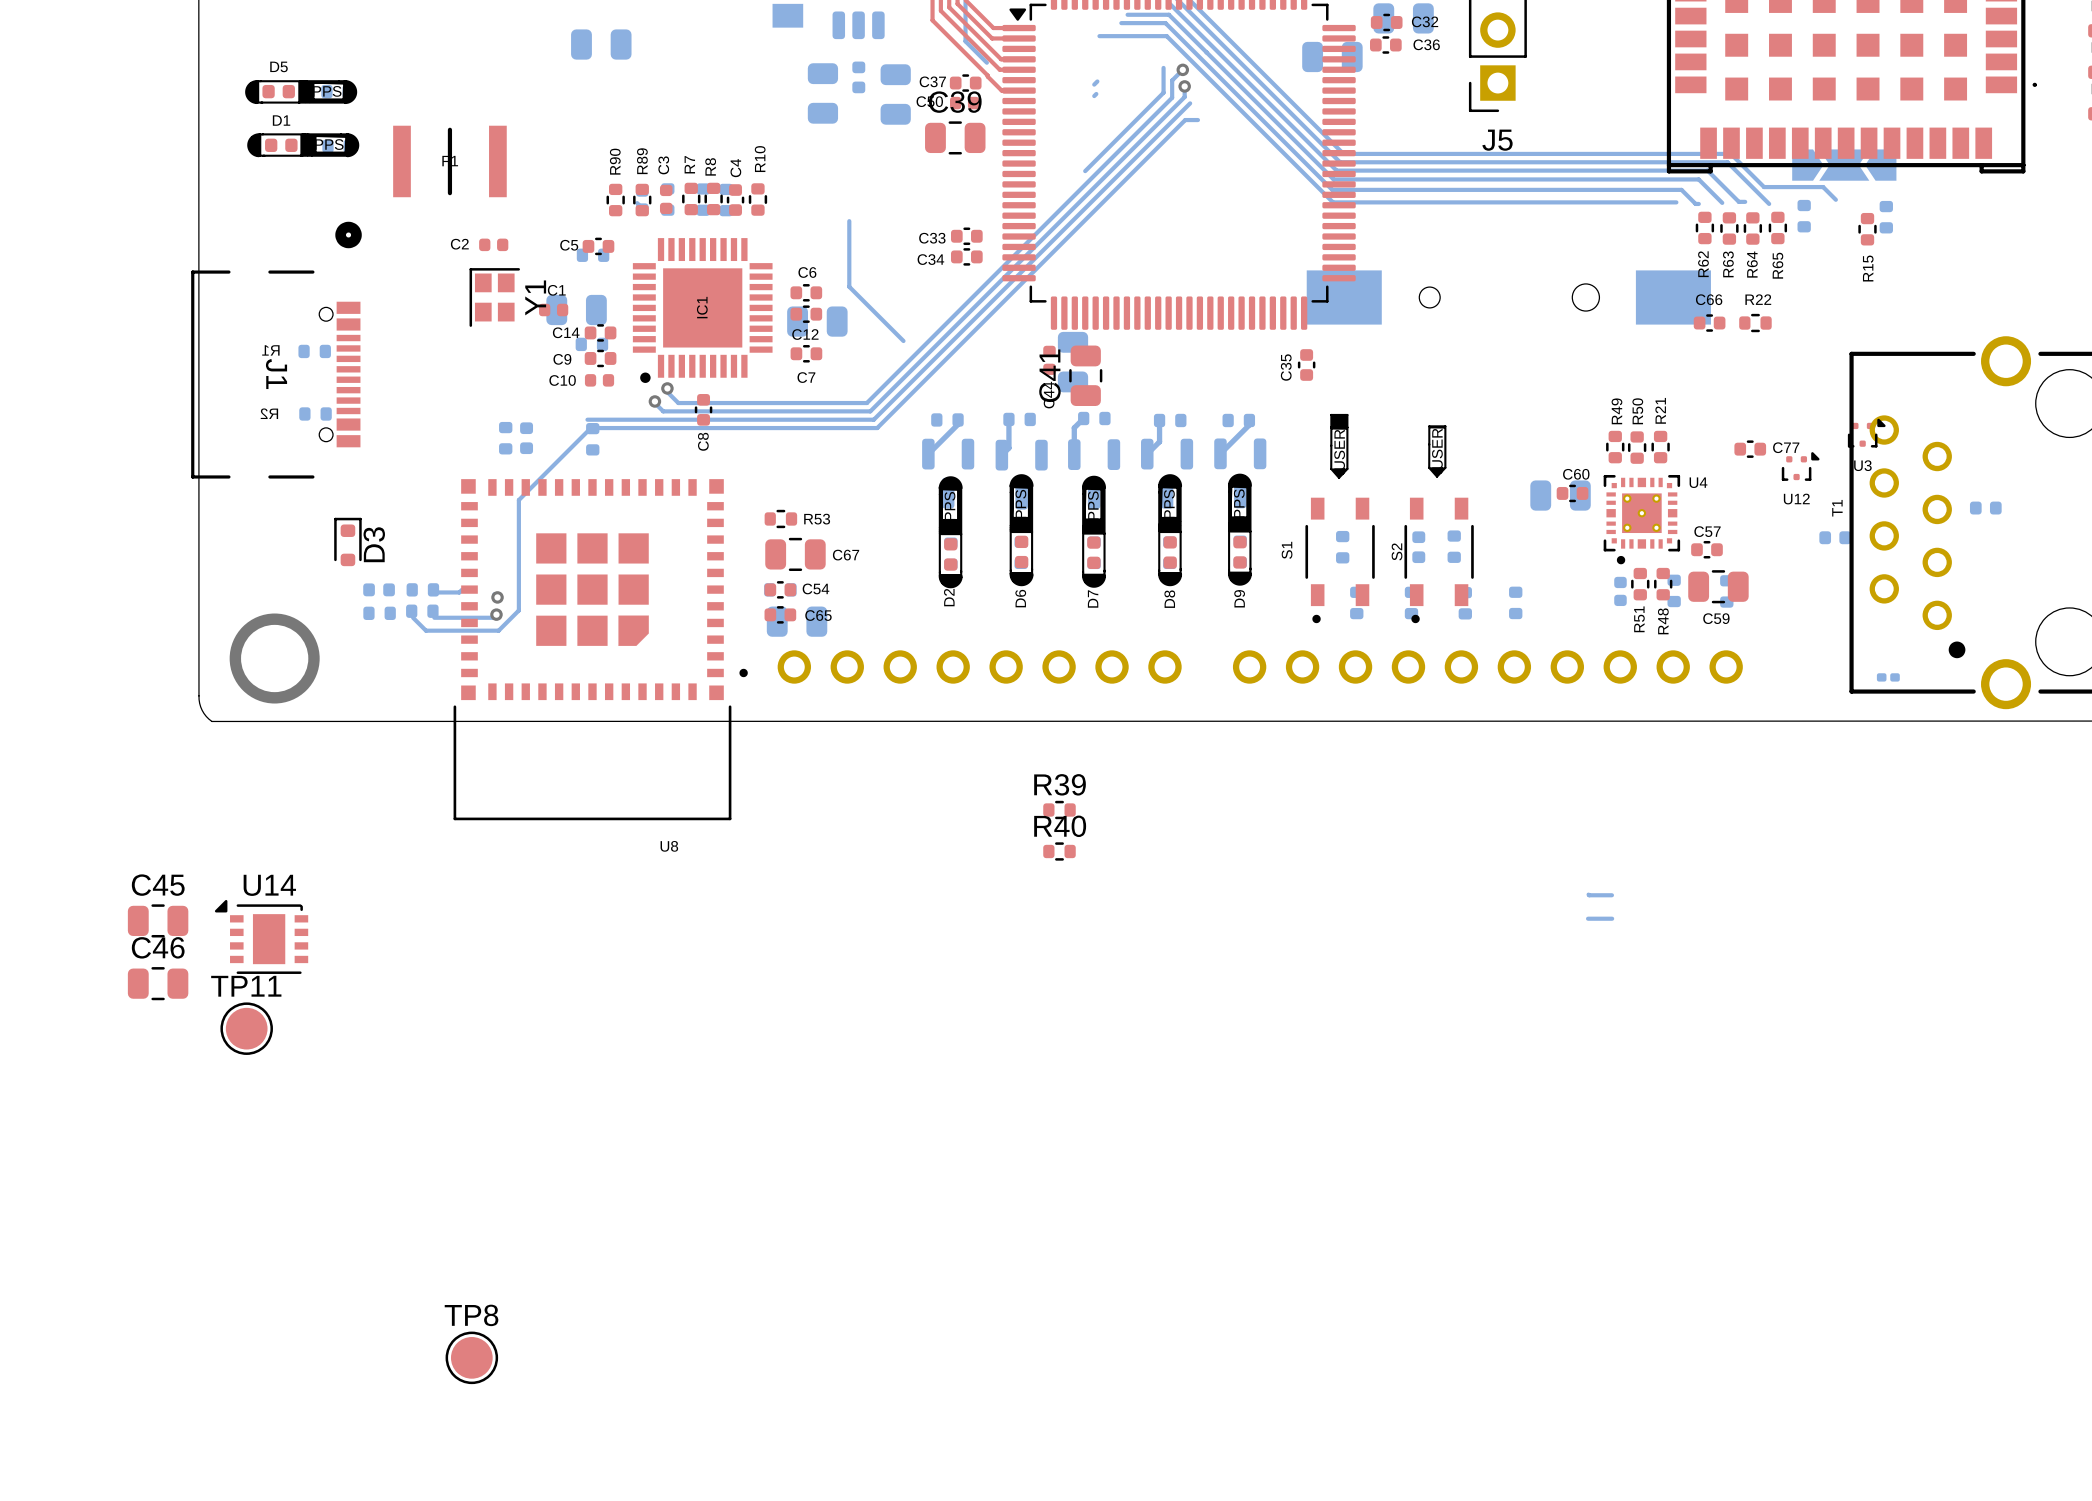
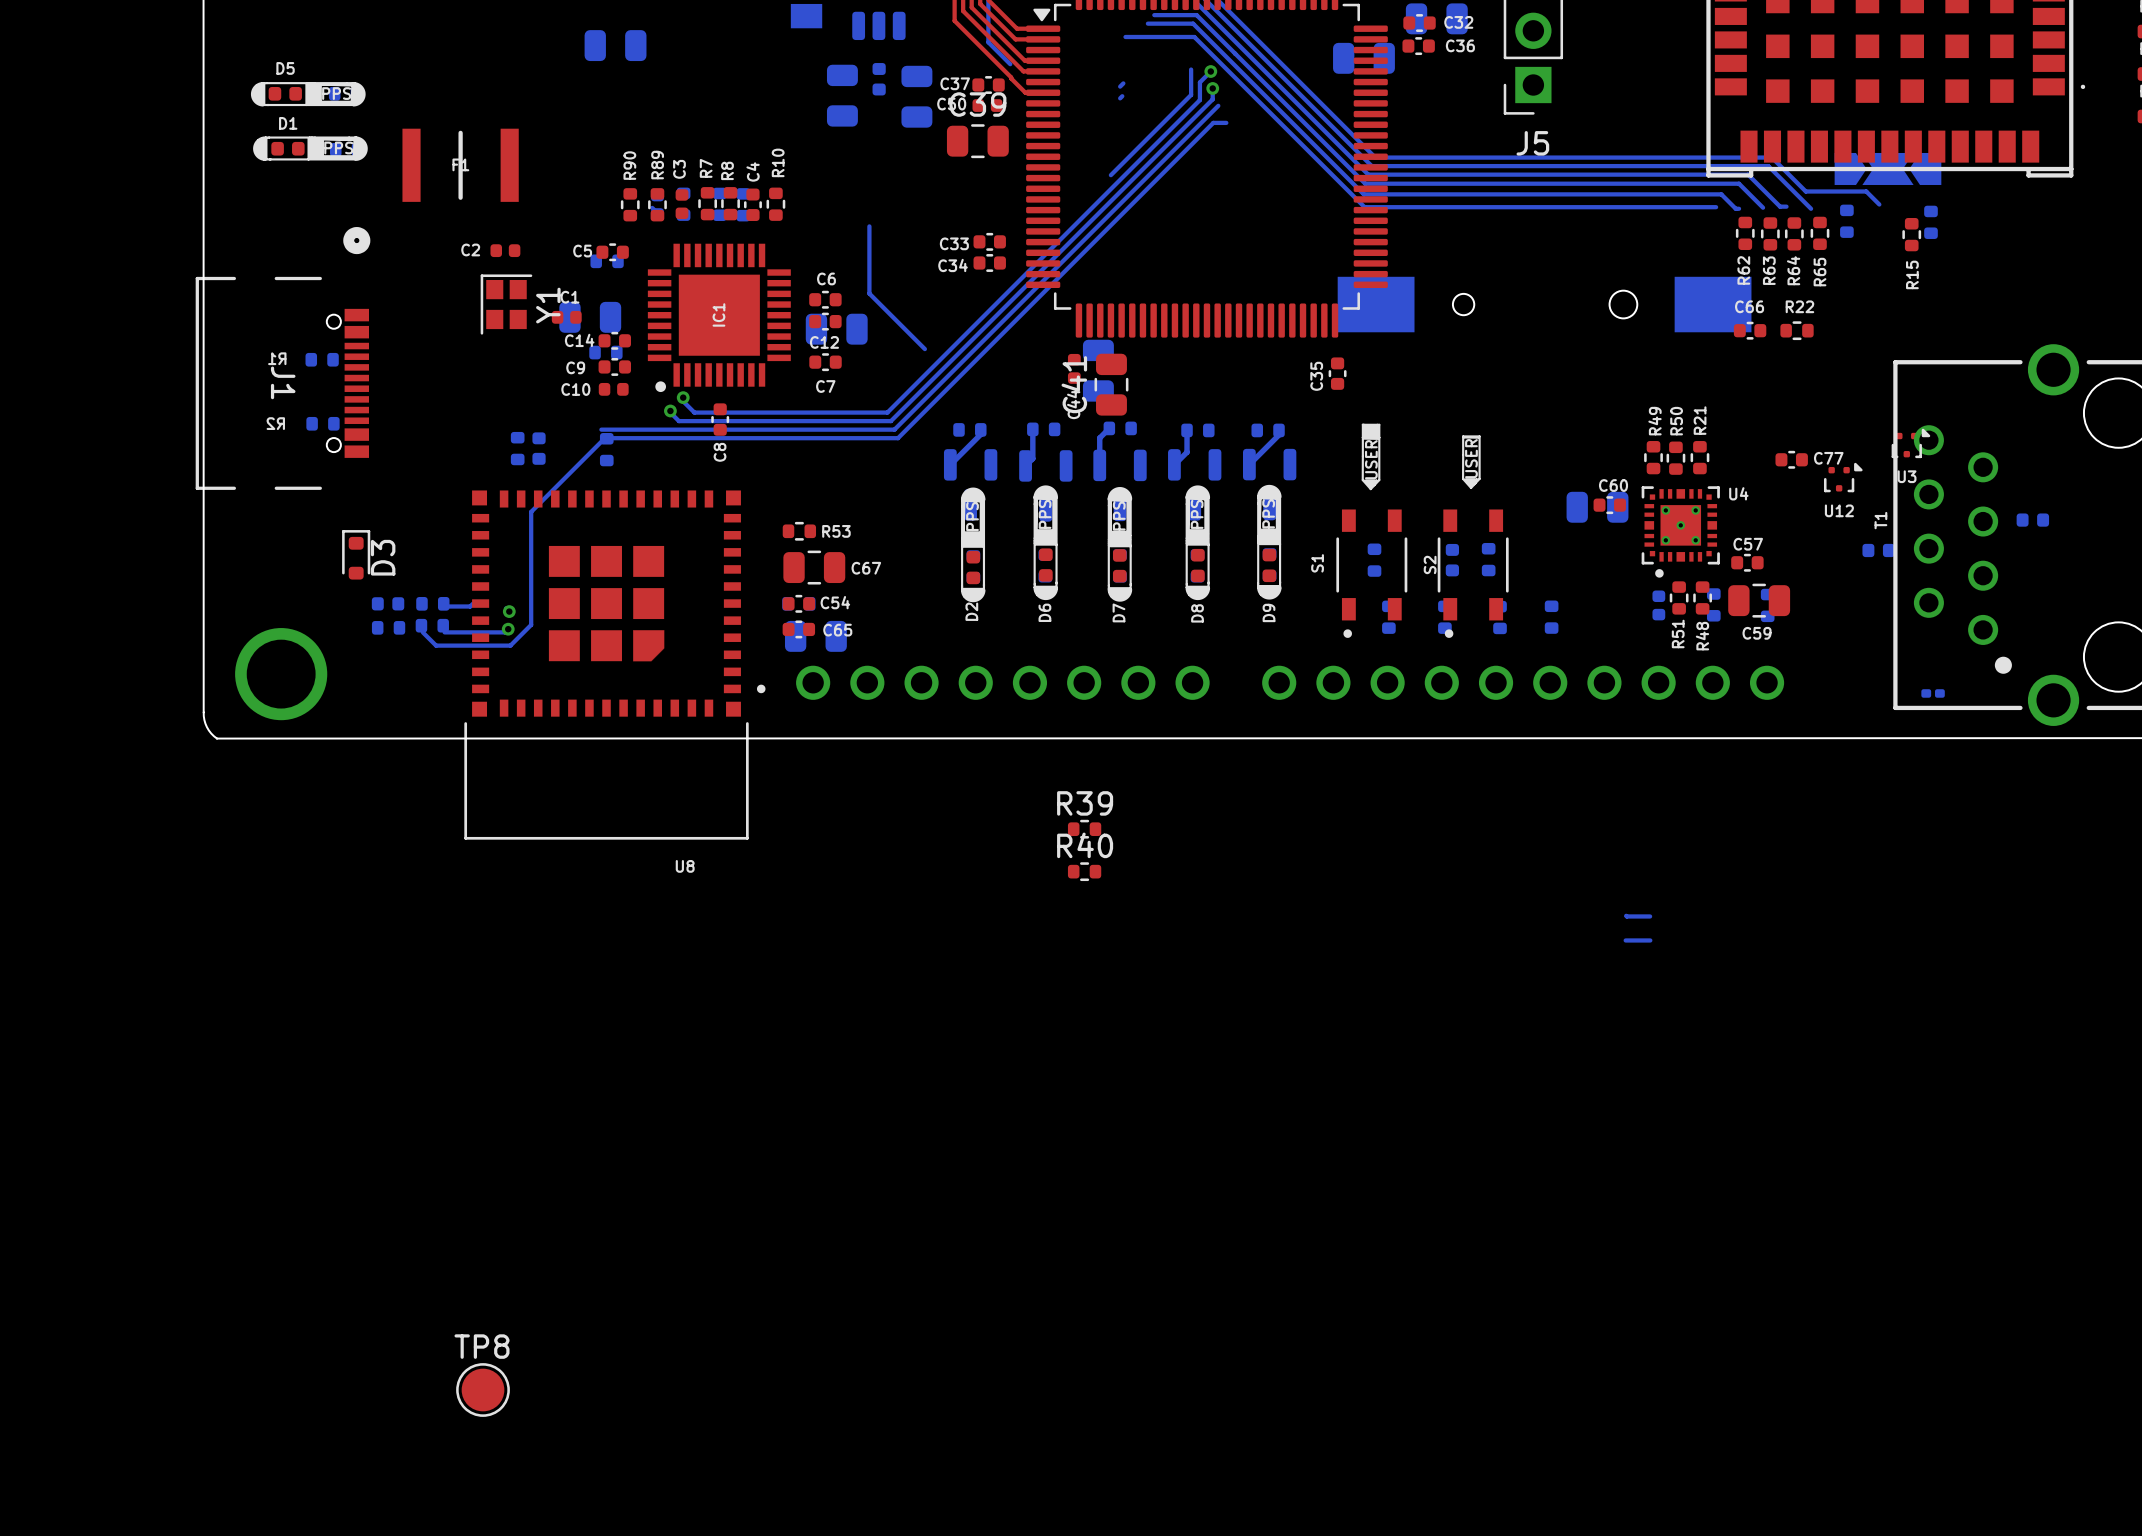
C45: (158, 920) -> none
U14: (261, 936) -> none
C46: (158, 983) -> none
TP11: (246, 1028) -> none

